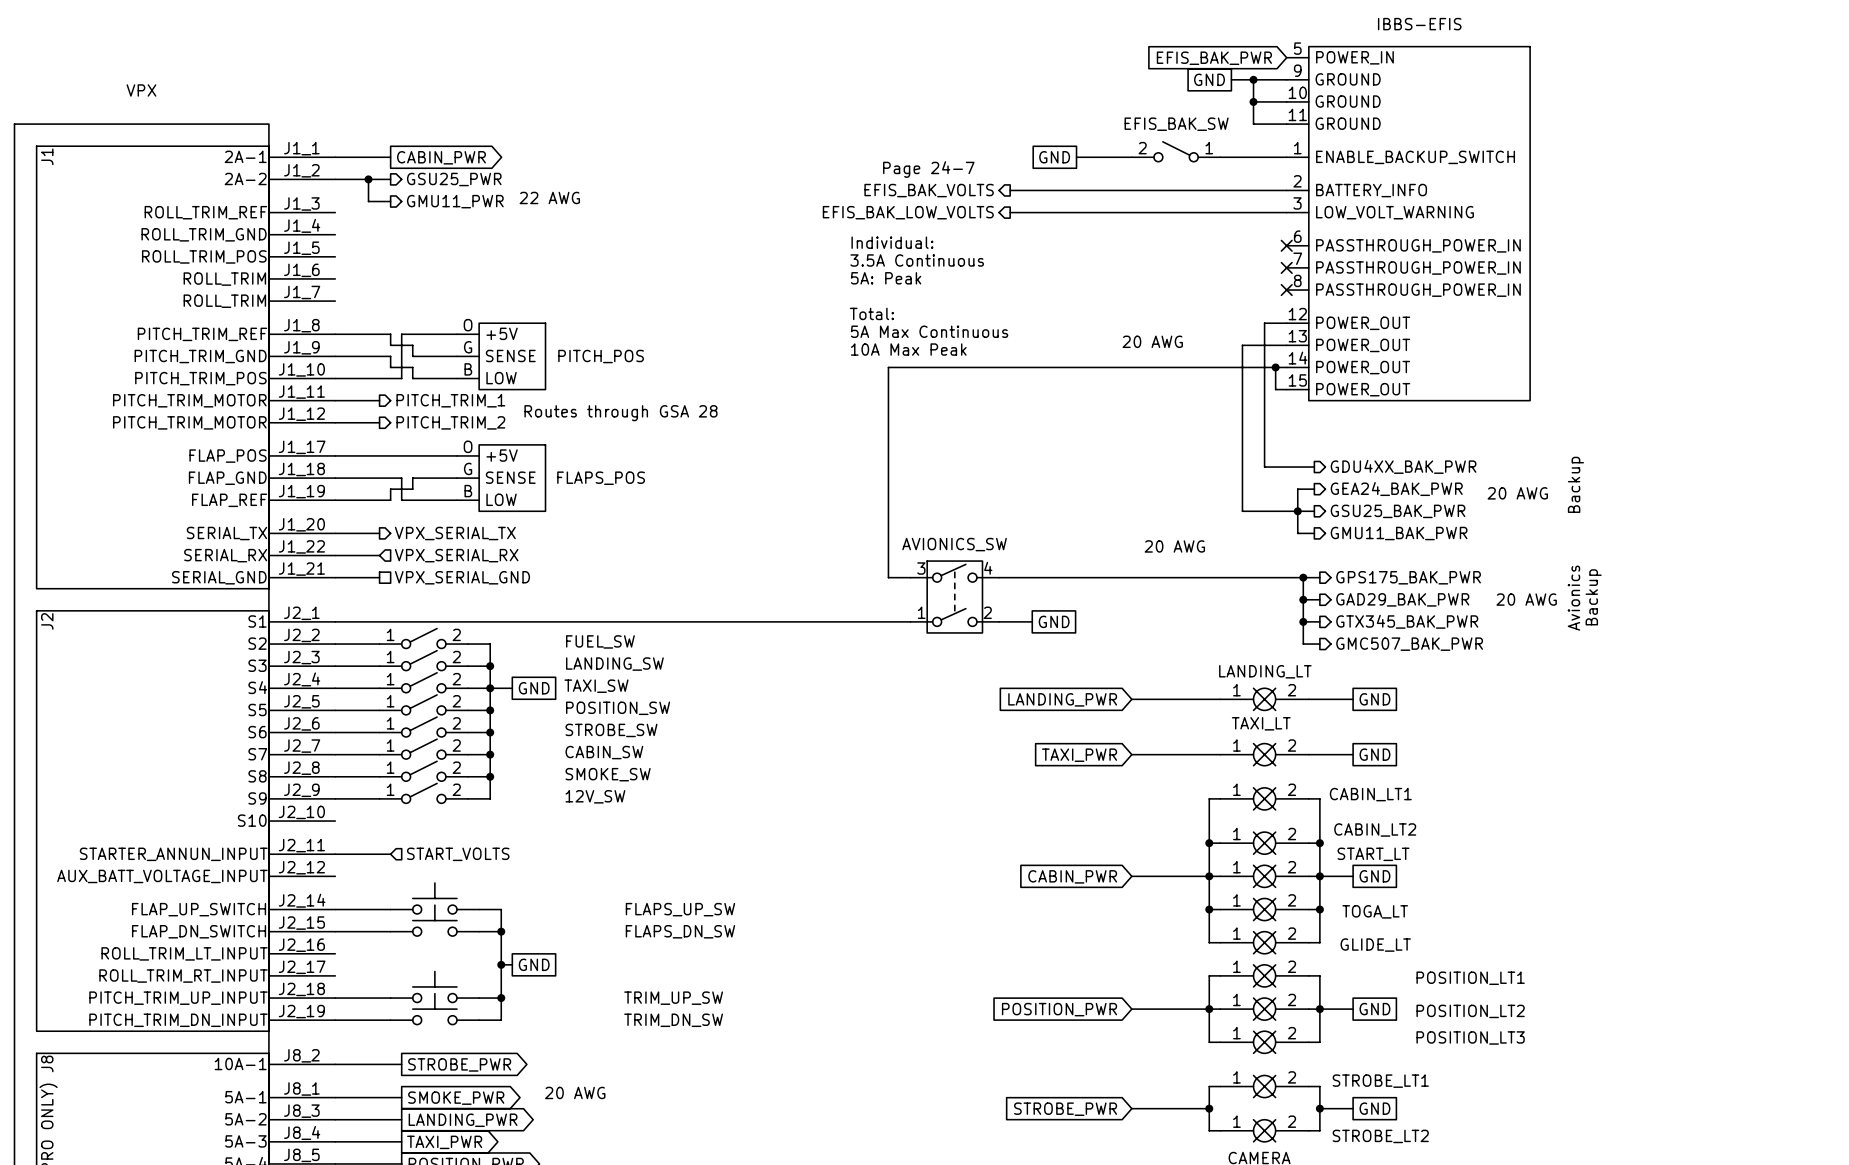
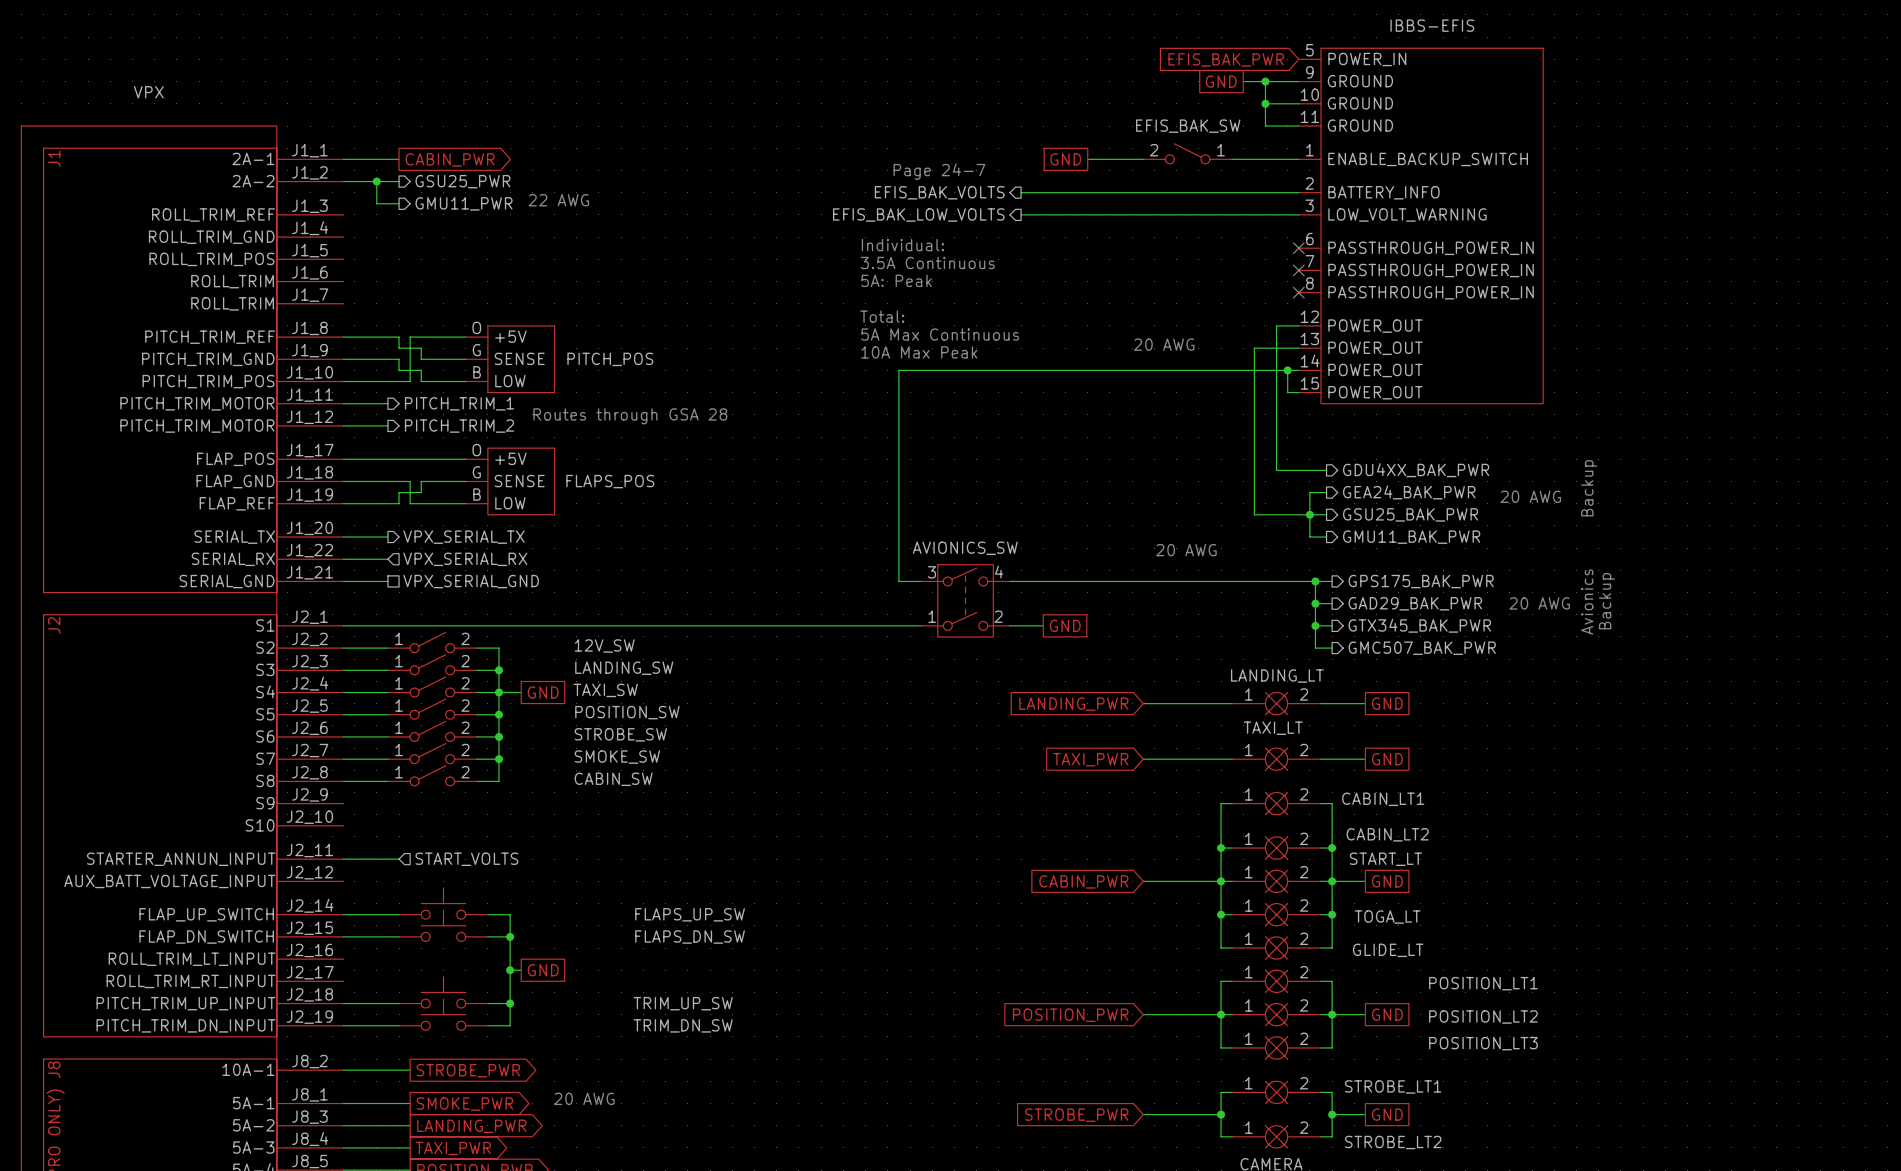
FUEL_SW name: FUEL_SW (600, 641) -> 12V_SW (604, 645)
CABIN_SW name: CABIN_SW (604, 752) -> SMOKE_SW (617, 757)
SMOKE_SW name: SMOKE_SW (608, 774) -> CABIN_SW (613, 779)
wire: (490, 776) (490, 798) (468, 798) -> none
junction: (490, 776) -> none
12V_SW: (423, 793) -> none
wire: (335, 798) (379, 798) -> none

